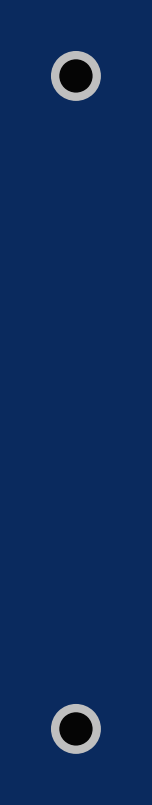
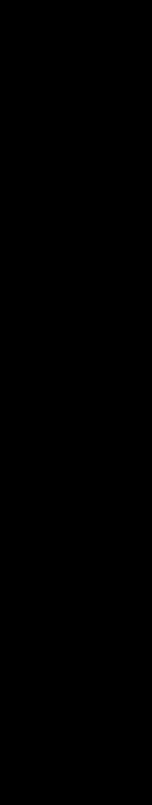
via: (75, 75) -> none
via: (75, 728) -> none

